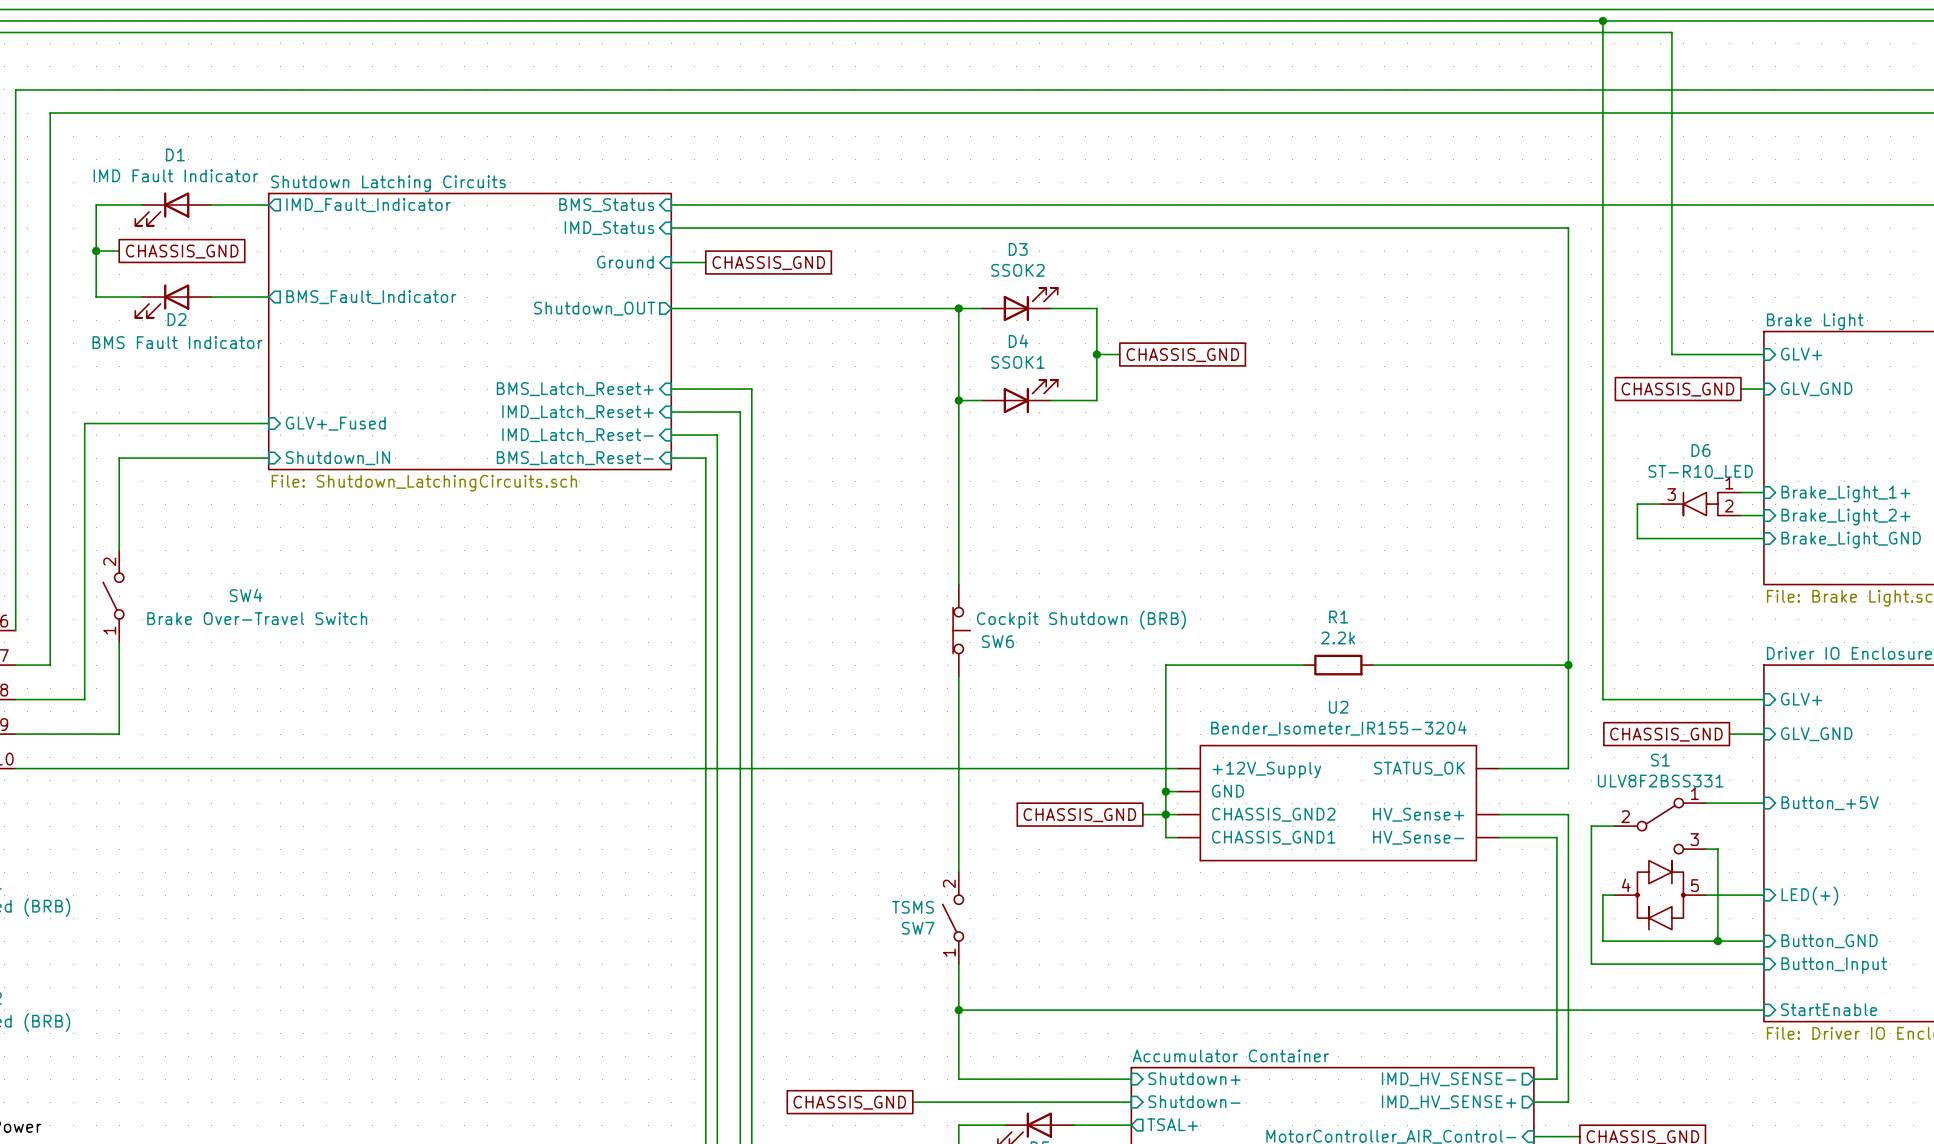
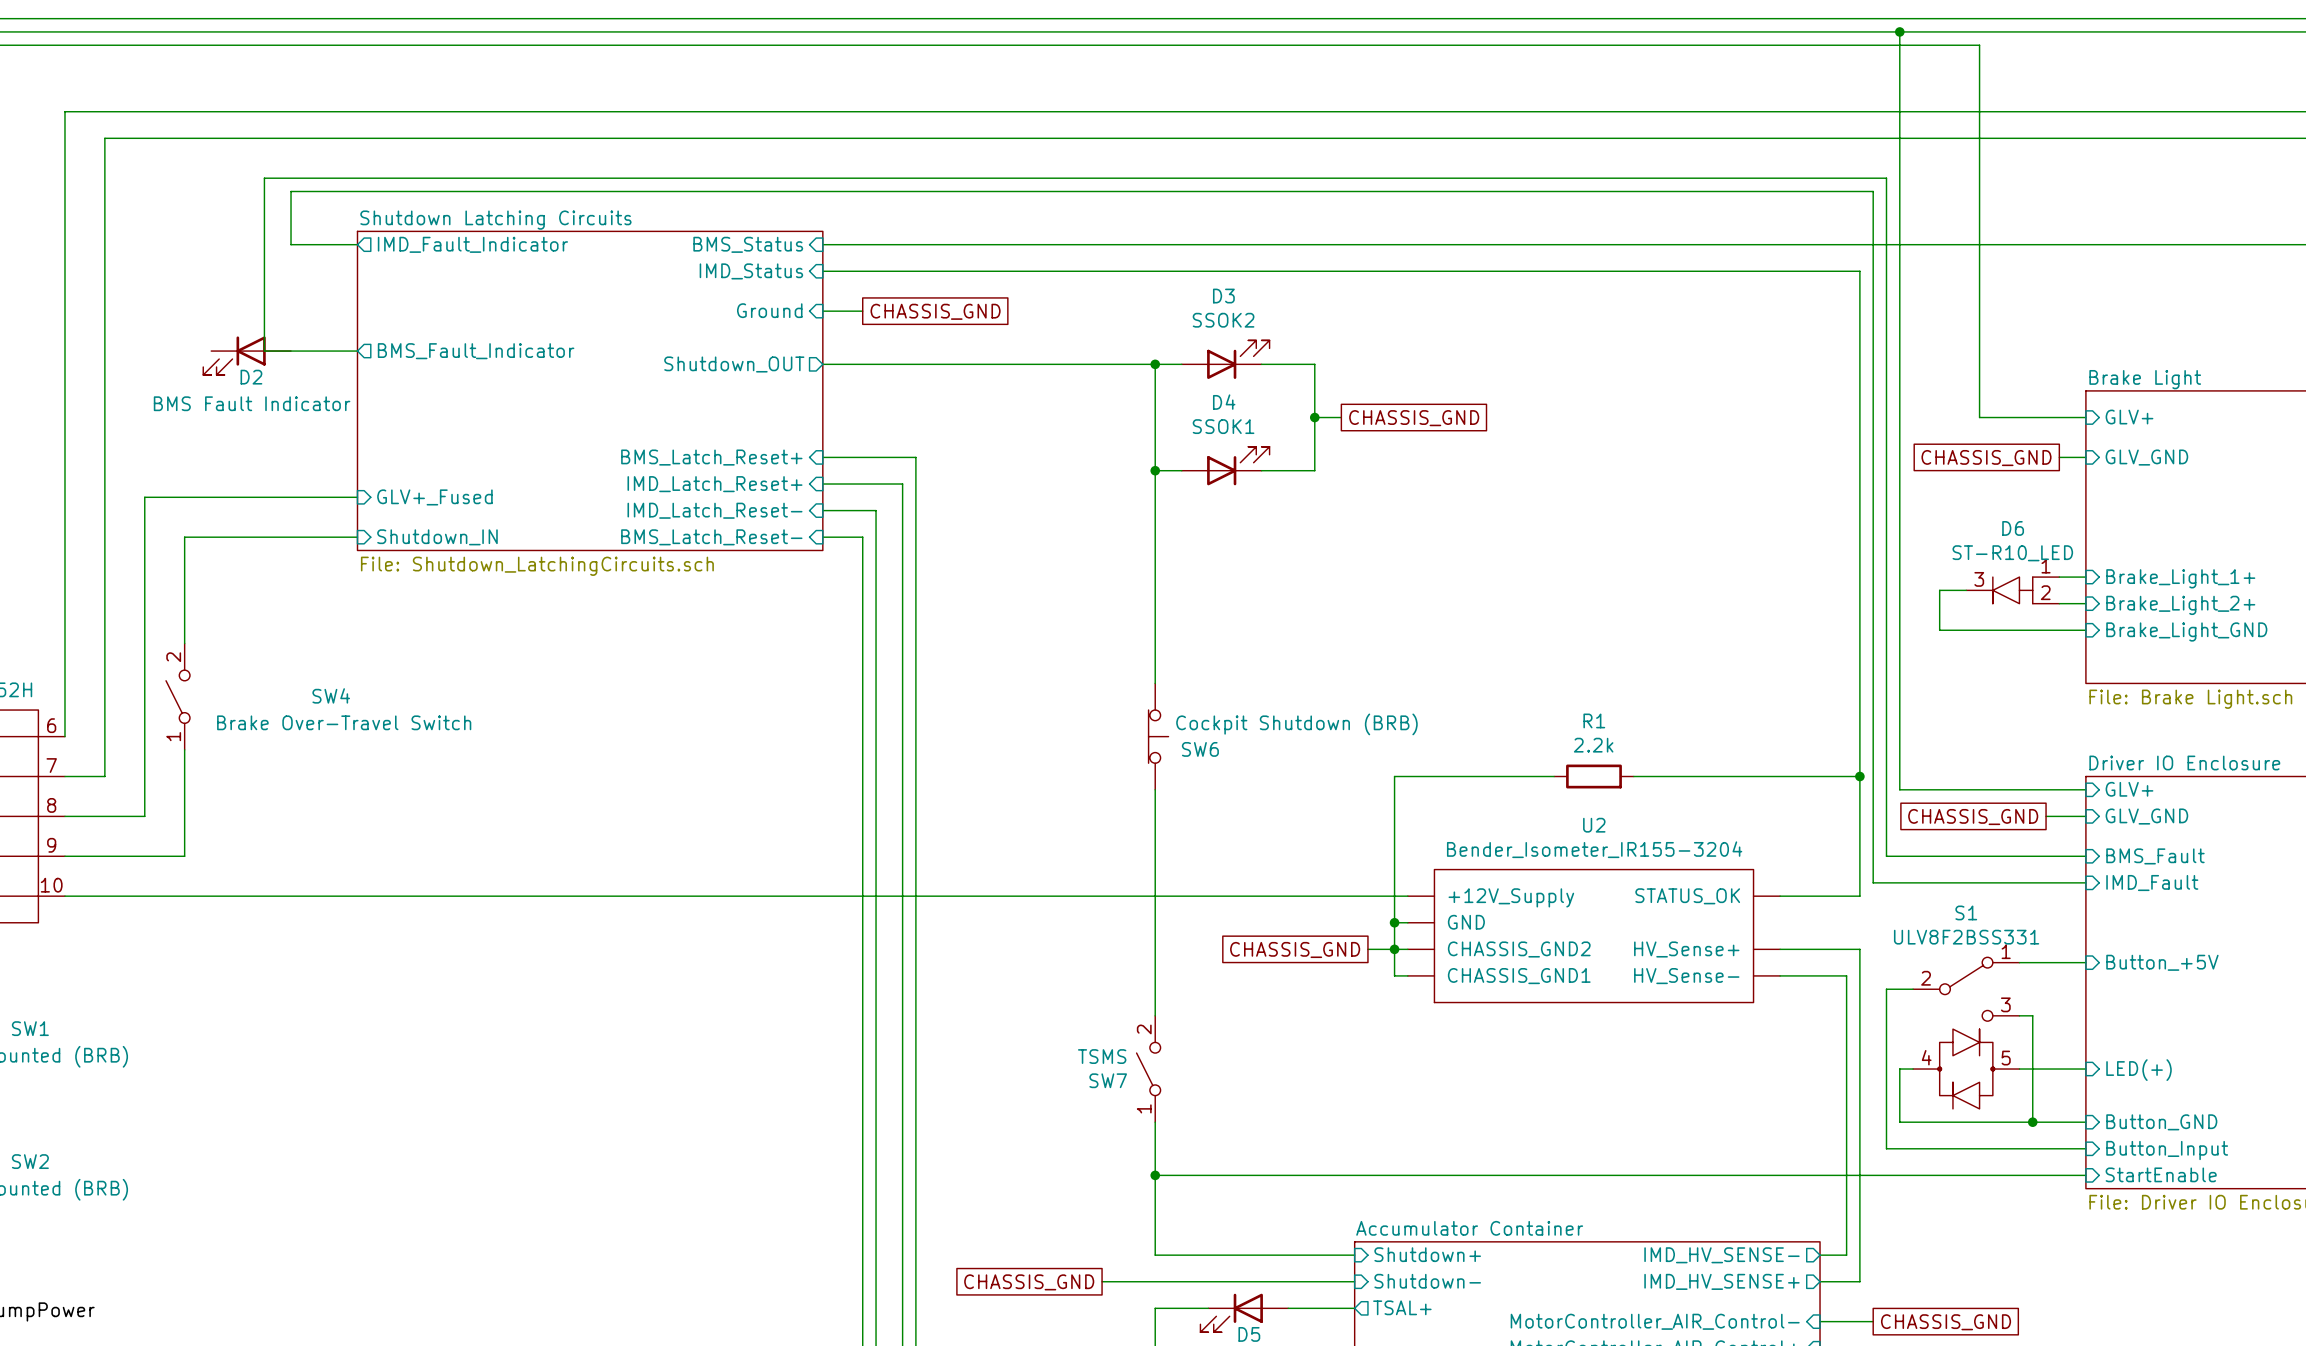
wire: (142, 205) (96, 205) (96, 297) (142, 297) -> none
wire: none -> (291, 244) (291, 191) (1873, 191) (1873, 882) (2085, 882)
D1: IMD Fault Indicator (173, 209) -> none
wire: (96, 251) (119, 251) -> none
junction: (96, 251) -> none
global label: CHASSIS_GND (182, 251) -> none
wire: none -> (291, 351) (264, 351) (264, 178) (1886, 178) (1886, 856) (2046, 856)
wire: (1602, 676) (1602, 699) (1729, 699) -> (1899, 789) (2085, 789)
sheet pin: none -> GLV+ (2129, 789)
sheet pin: GLV+ (1801, 699) -> GLV_GND (2146, 816)
global label position: CHASSIS_GND (1666, 734) -> CHASSIS_GND (1973, 817)
sheet pin: GLV_GND (1816, 734) -> BMS_Fault (2155, 856)
sheet pin: none -> IMD_Fault (2152, 883)
wire: (1706, 803) (1763, 803) -> (2019, 962) (2085, 962)
sheet pin position: Button_+5V (1830, 803) -> Button_+5V (2162, 962)
wire: (1614, 826) (1591, 826) (1591, 849) -> (1913, 989) (1886, 989)
wire: (1706, 849) (1717, 849) (1717, 872) -> (2019, 1015) (2032, 1015)
S1 position: (1660, 864) -> (1966, 1033)
wire: (1614, 895) (1602, 895) (1602, 918) -> (1913, 1069) (1899, 1069)
wire: (1706, 895) (1763, 895) -> (2019, 1069) (2085, 1069)
sheet pin position: LED(+) (1809, 896) -> LED(+) (2139, 1070)
wire: (1602, 941) (1763, 941) -> none
wire: none -> (2032, 1095) (2032, 1122)
junction position: (1717, 941) -> (2032, 1122)
sheet pin: Button_GND (1829, 941) -> none
wire: (1591, 964) (1602, 964) -> (1899, 1095) (1899, 1122)
wire: none -> (1886, 1122) (1886, 1148) (2085, 1148)
sheet pin: Button_Input (1834, 965) -> Button_GND (2161, 1122)
sheet pin: none -> Button_Input (2167, 1150)

